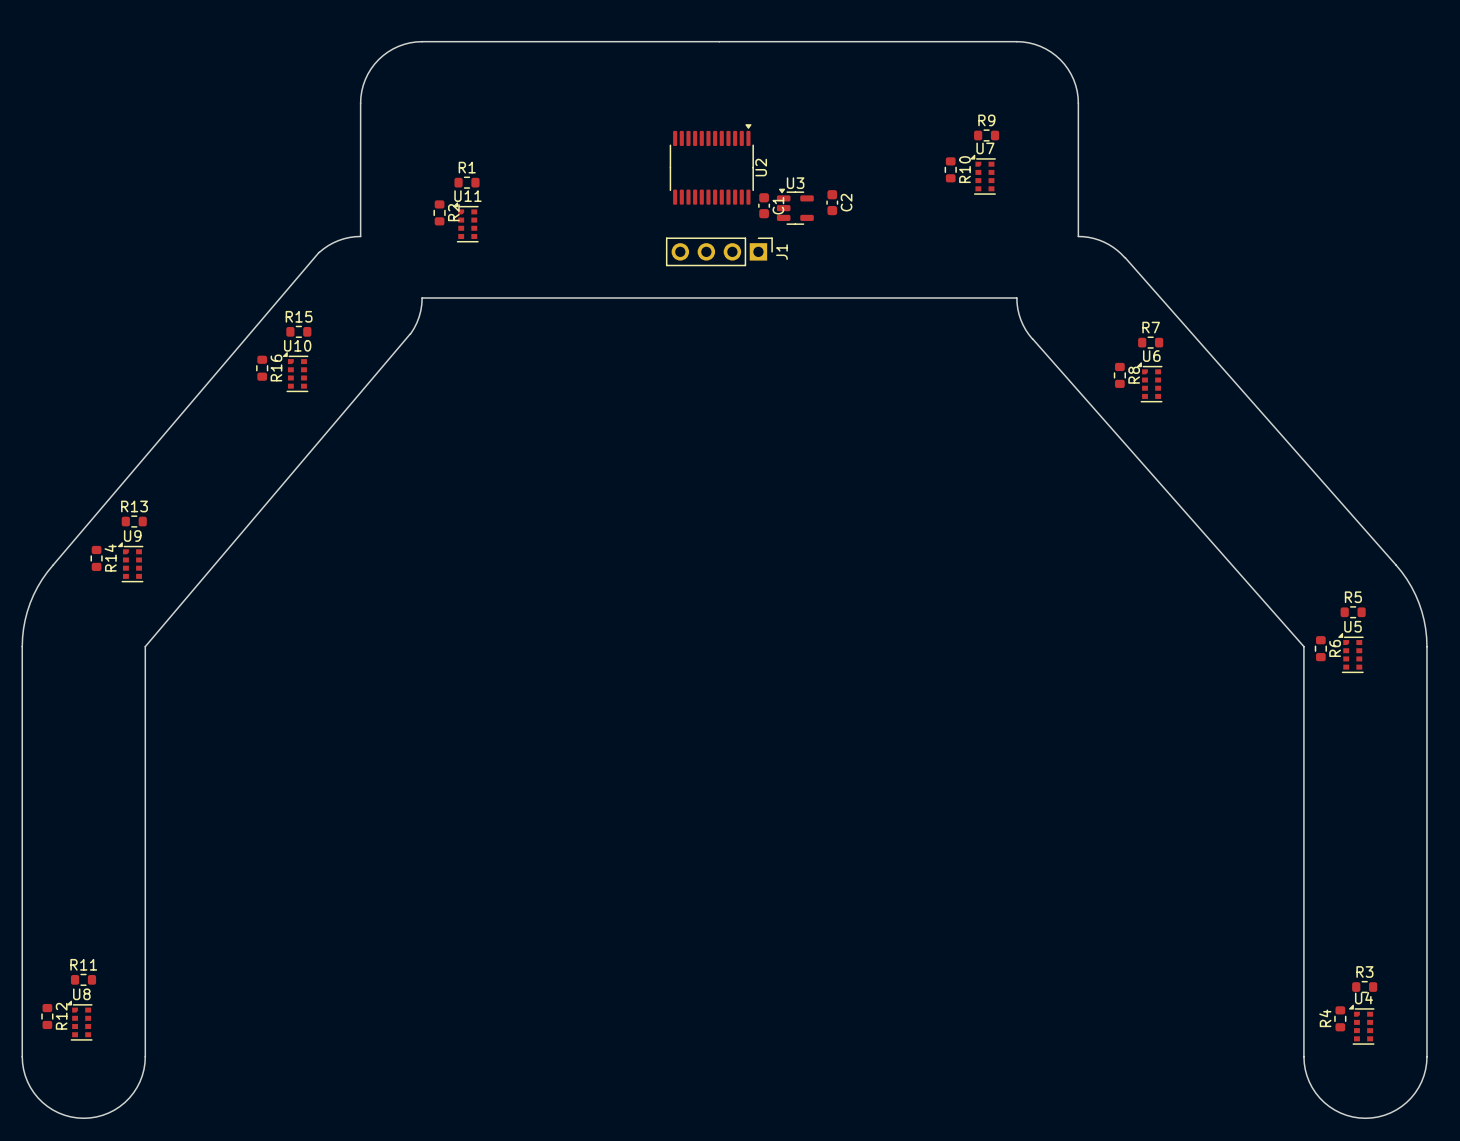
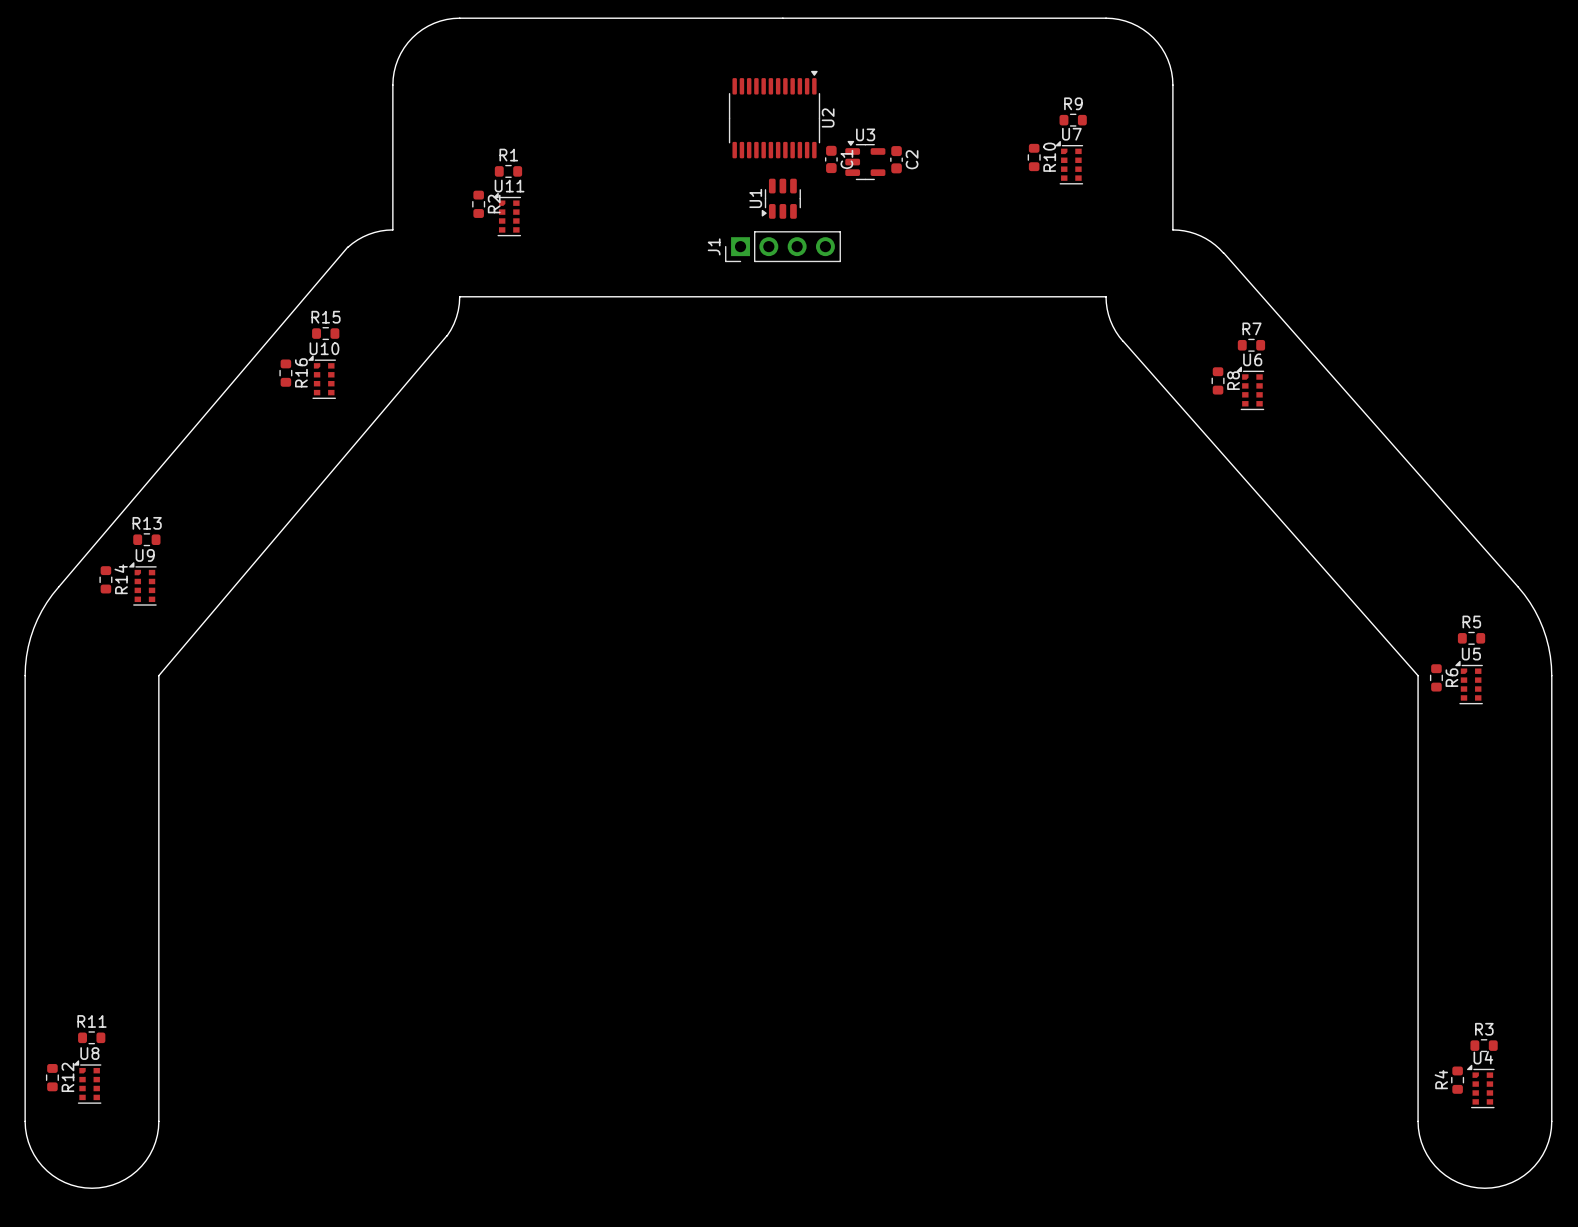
U2 position: (711, 164) -> (774, 114)
C2 position: (832, 202) -> (896, 159)
C1 position: (764, 205) -> (831, 159)
U3 position: (795, 206) -> (865, 160)
U1: none -> (781, 198)
J1 rotation: 0° (719, 251) -> 180° (782, 246)

